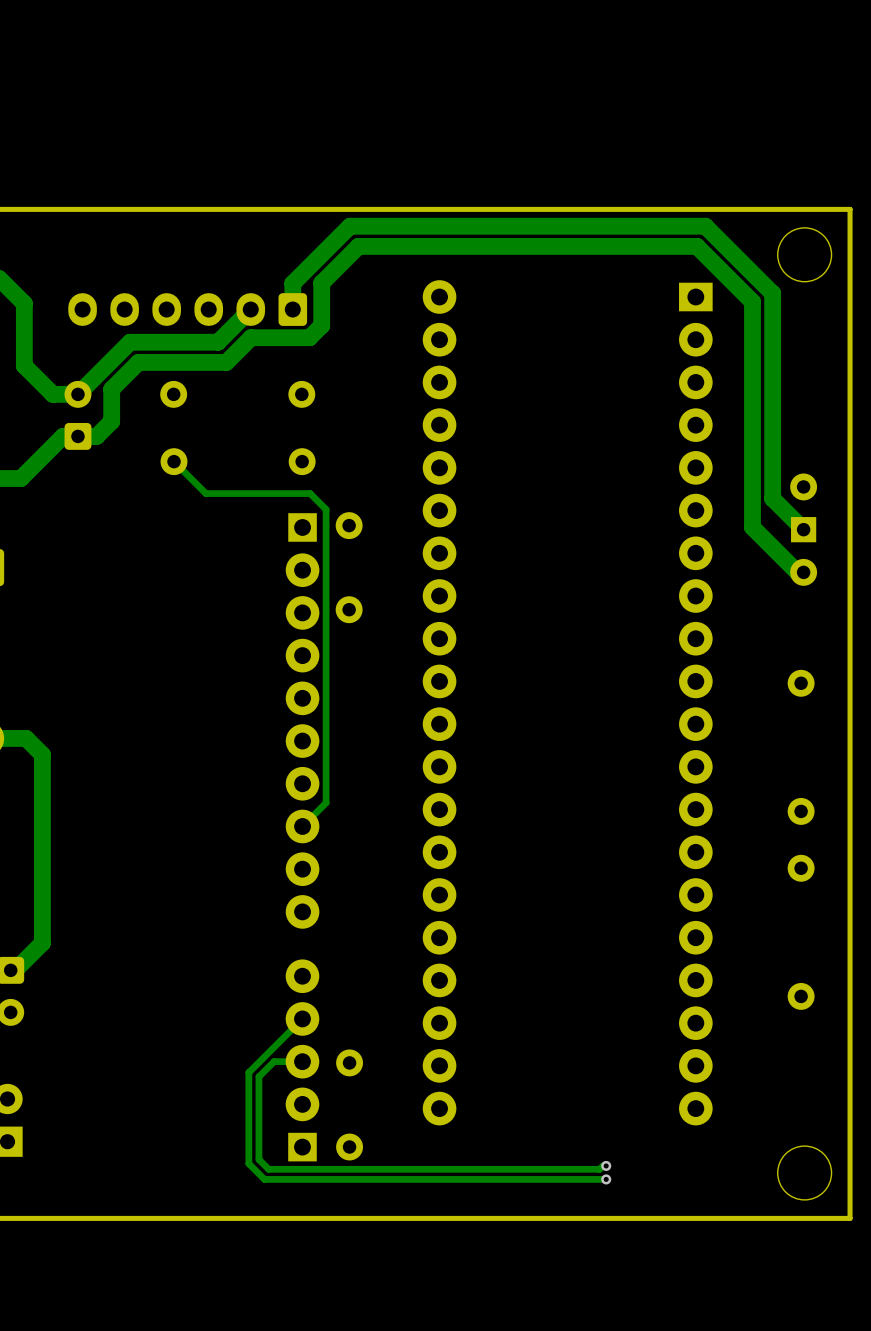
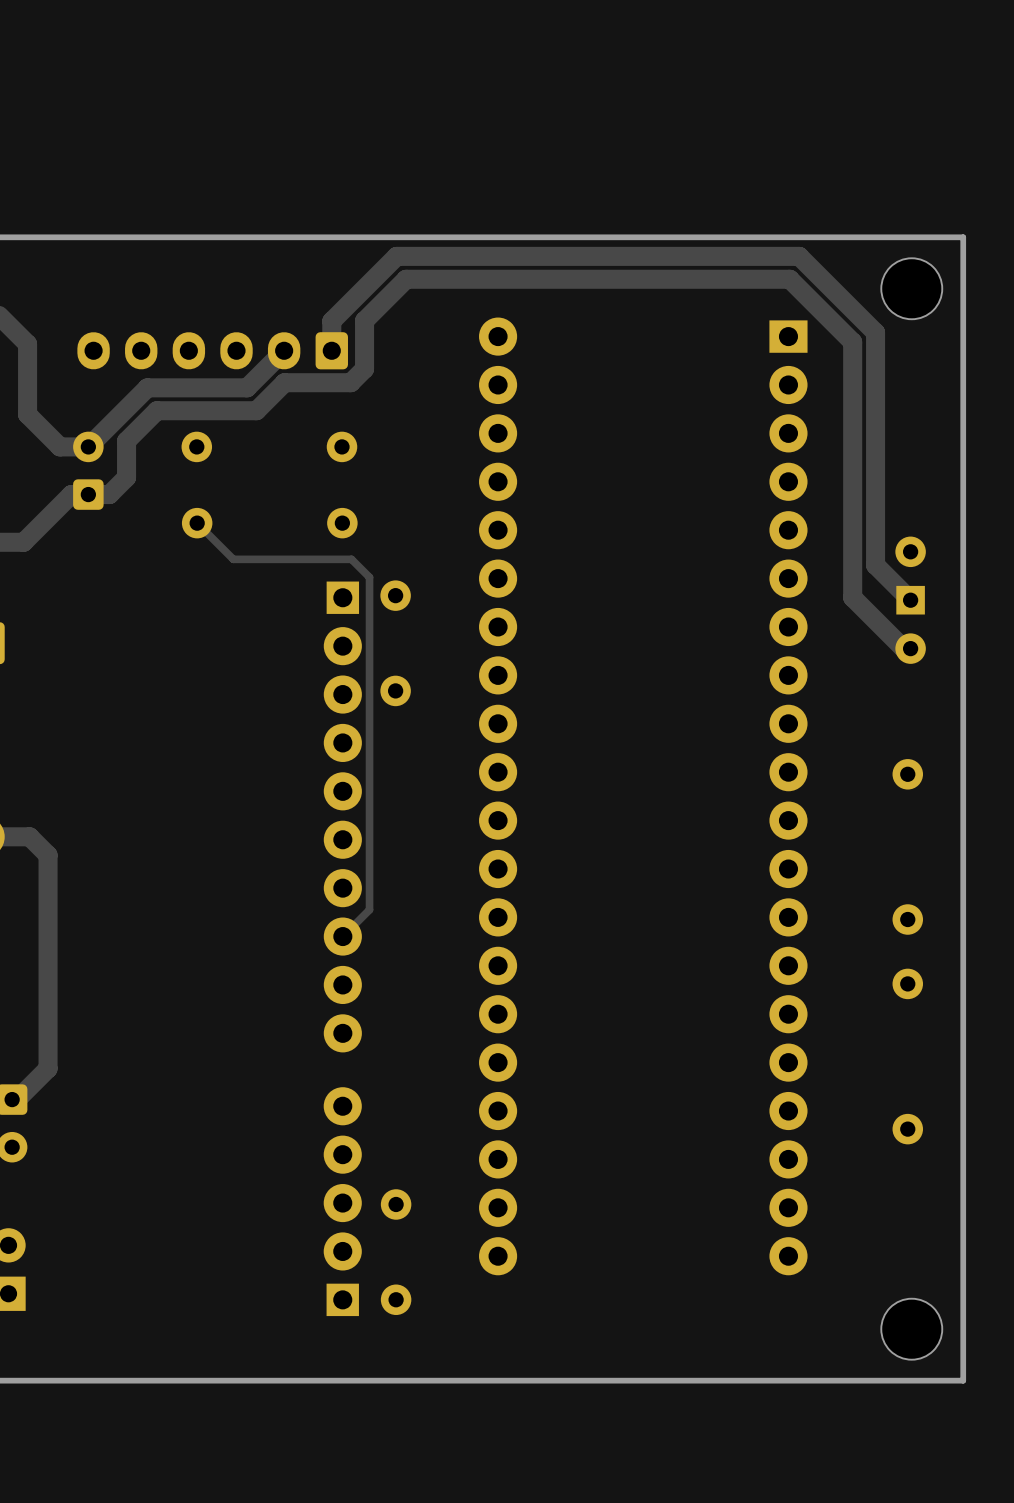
track: (302, 1018) (248, 1072) (248, 1163) (264, 1179) (606, 1179) -> none
track: (302, 1061) (274, 1061) (258, 1076) (258, 1159) (268, 1169) (599, 1169) (606, 1165) -> none
via: (606, 1165) -> none
via: (606, 1179) -> none

